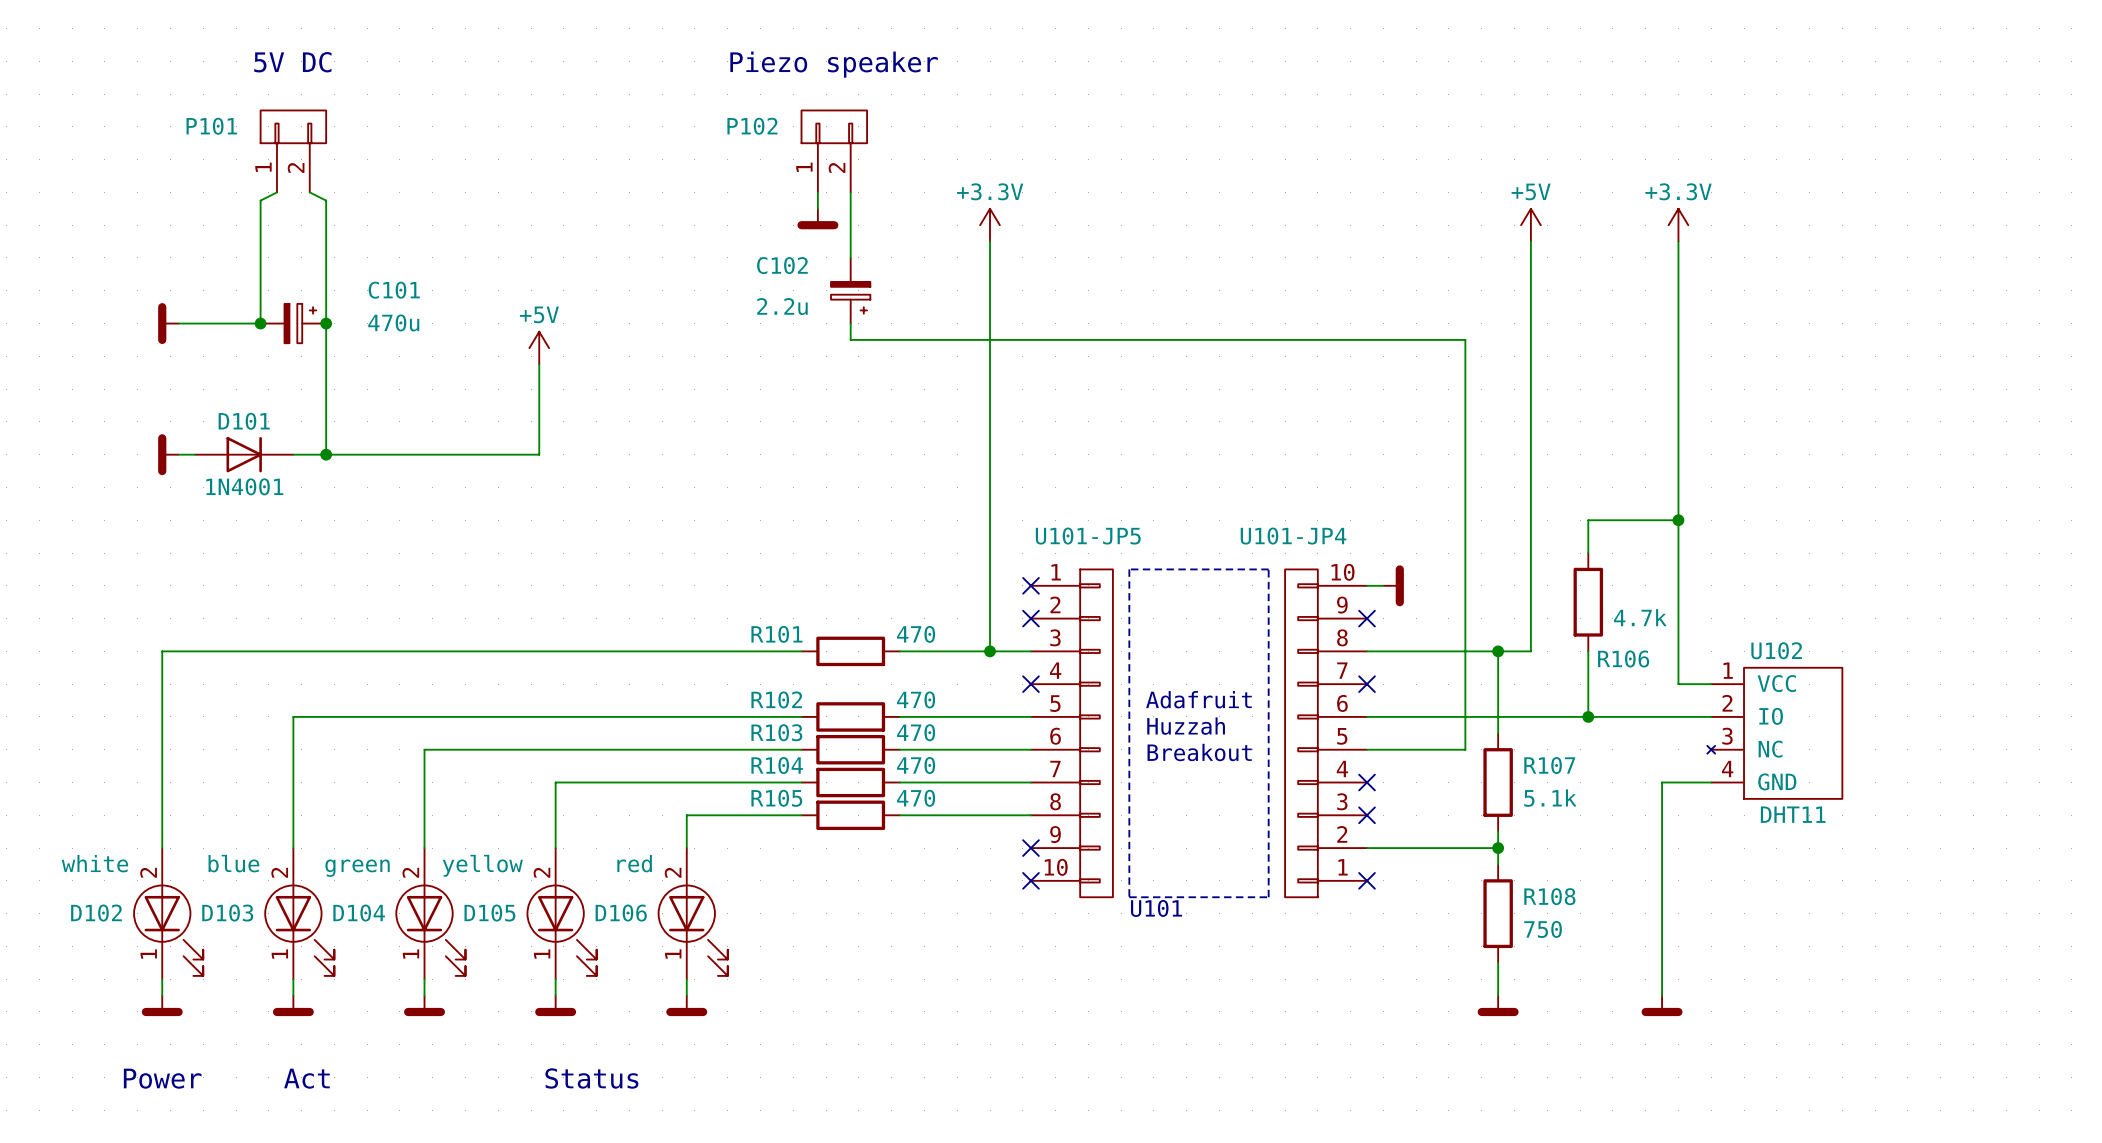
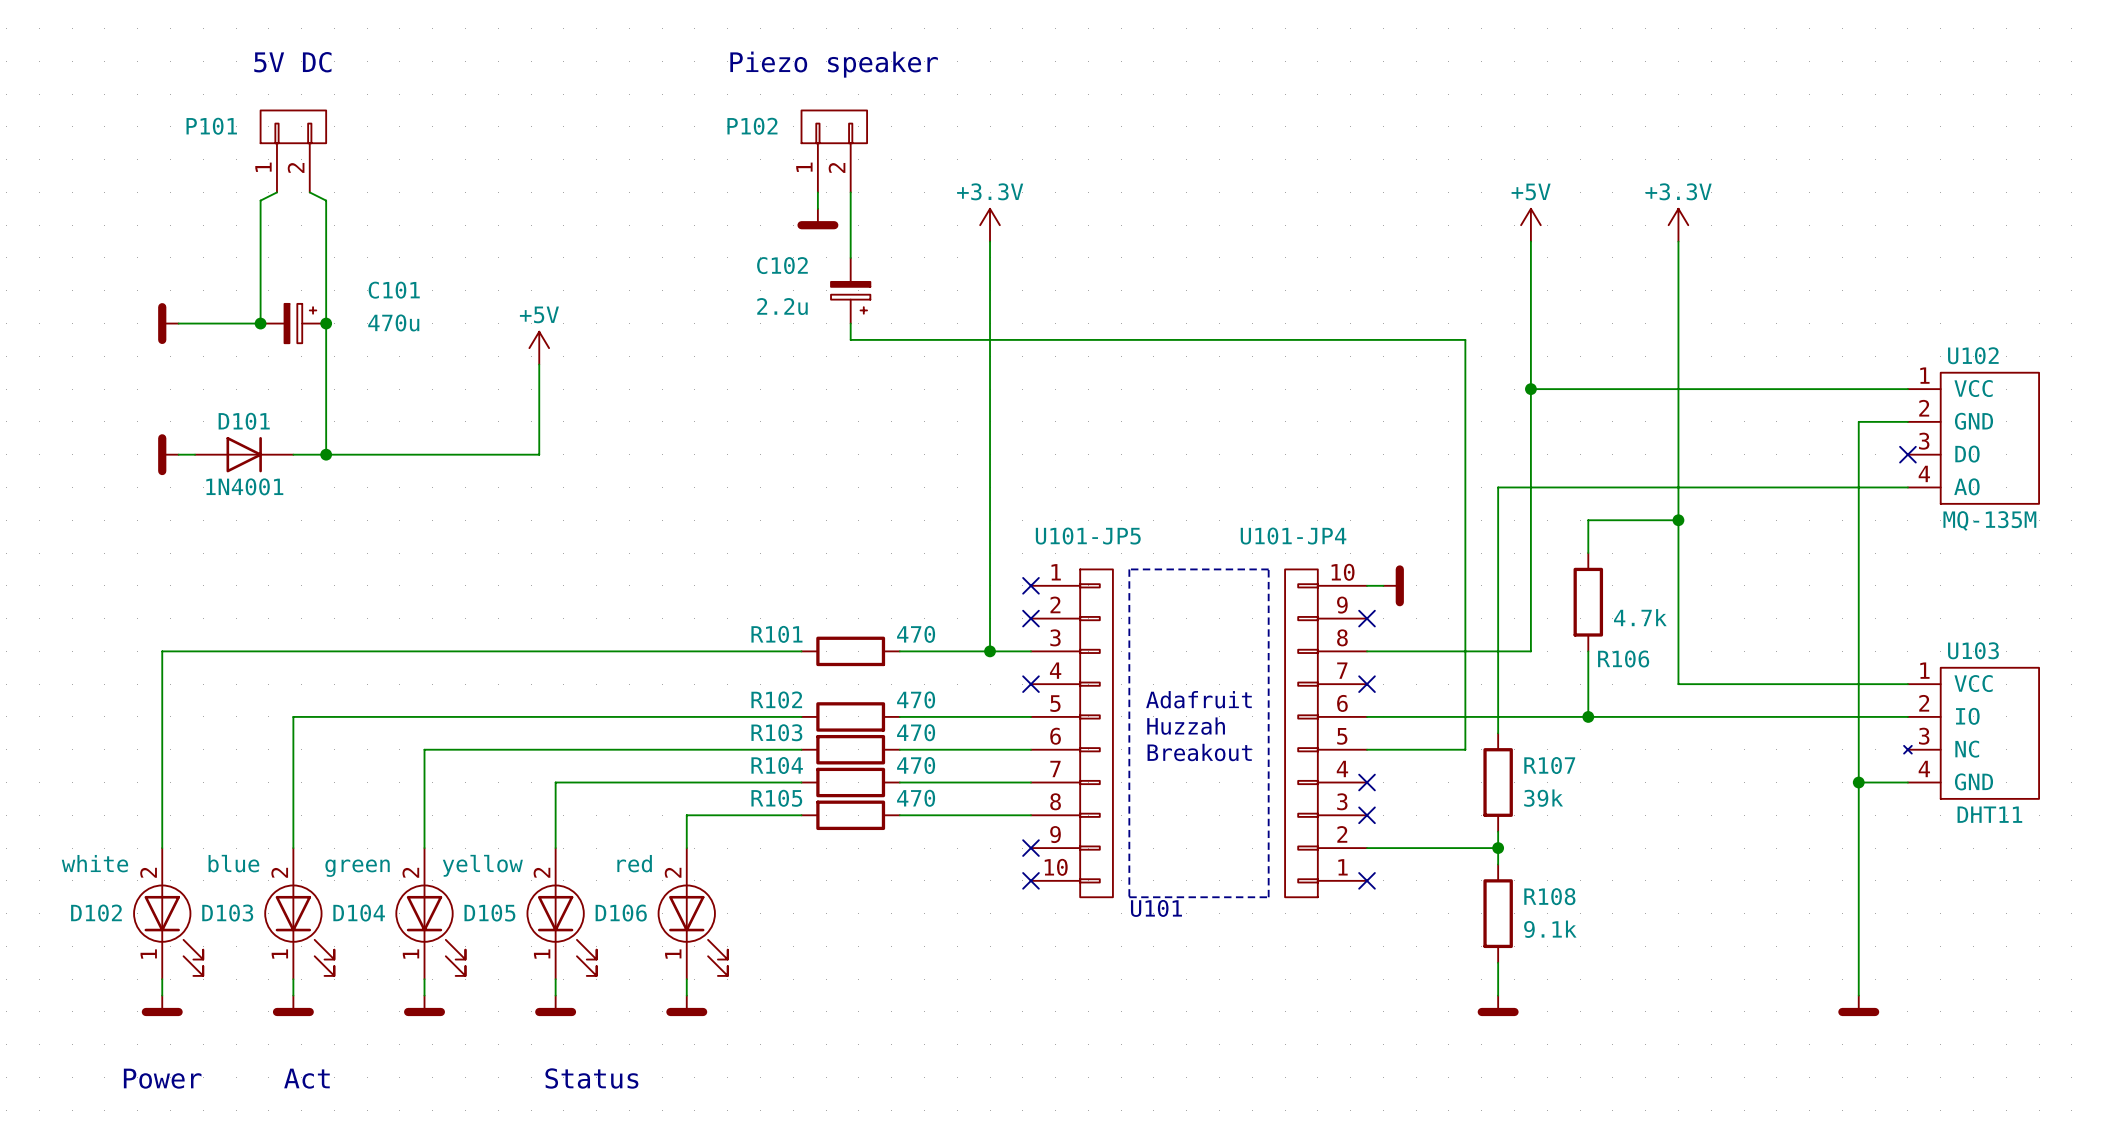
wire: none -> (1530, 389) (1907, 389)
junction: none -> (1530, 389)
wire: none -> (1907, 421) (1858, 421) (1858, 995)
no-connect mark: none -> (1907, 454)
wire: none -> (1907, 487) (1498, 487) (1498, 651)
junction: (1498, 651) -> none
U102 symbol: [1707, 667, 1843, 799] -> [1907, 372, 2040, 504]
wire: none -> (1711, 684) (1907, 684)
wire: none -> (1711, 716) (1907, 716)
U103: none -> DHT11 (1971, 733)
wire: (1711, 782) (1662, 782) (1662, 995) -> none
wire: none -> (1858, 782) (1907, 782)
junction: none -> (1858, 782)
R107 value: 5.1k (1550, 798) -> 39k (1543, 798)
U102 value: DHT11 (1793, 814) -> MQ-135M (1989, 520)
R108 value: 750 (1543, 929) -> 9.1k (1550, 929)
power symbol position: (1662, 1005) -> (1858, 1005)

